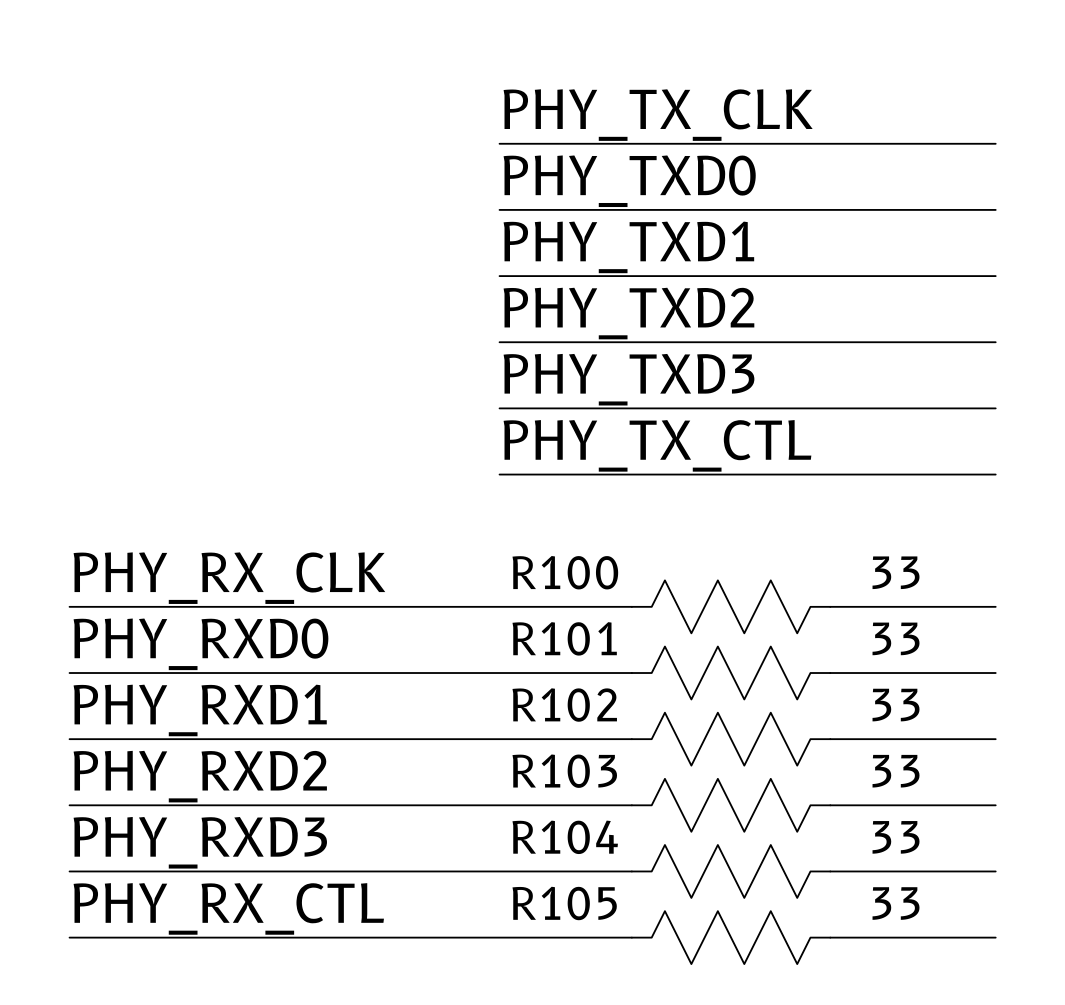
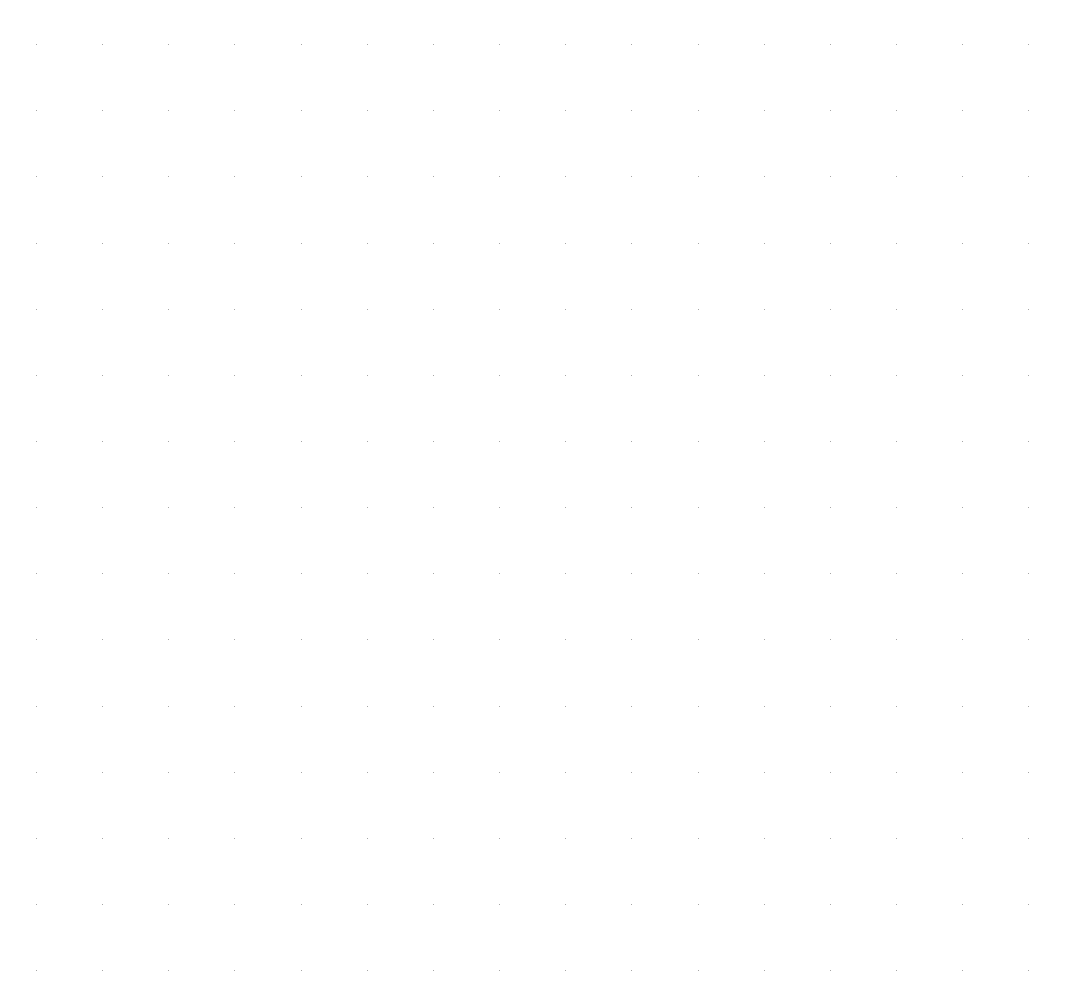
label: PHY_TX_CLK (658, 115) -> none
wire: (499, 143) (995, 143) -> none
label: PHY_TXD0 (629, 181) -> none
wire: (499, 209) (995, 209) -> none
label: PHY_TXD1 (628, 247) -> none
wire: (499, 276) (995, 276) -> none
label: PHY_TXD2 (628, 313) -> none
wire: (499, 342) (995, 342) -> none
label: PHY_TXD3 (628, 379) -> none
wire: (499, 408) (995, 408) -> none
label: PHY_TX_CTL (657, 445) -> none
wire: (499, 474) (995, 474) -> none
label: PHY_RX_CLK (229, 578) -> none
wire: (69, 606) (631, 606) -> none
R100: 33 (731, 606) -> none
wire: (830, 606) (995, 606) -> none
label: PHY_RXD0 (200, 644) -> none
wire: (69, 673) (631, 673) -> none
R101: 33 (731, 673) -> none
wire: (830, 673) (995, 673) -> none
label: PHY_RXD1 (200, 710) -> none
wire: (69, 739) (631, 739) -> none
R102: 33 (731, 739) -> none
wire: (830, 739) (995, 739) -> none
label: PHY_RXD2 (200, 776) -> none
wire: (69, 805) (631, 805) -> none
R103: 33 (731, 805) -> none
wire: (830, 805) (995, 805) -> none
label: PHY_RXD3 (200, 842) -> none
wire: (69, 871) (631, 871) -> none
R104: 33 (731, 871) -> none
wire: (830, 871) (995, 871) -> none
label: PHY_RX_CTL (228, 908) -> none
wire: (69, 937) (631, 937) -> none
R105: 33 (731, 937) -> none
wire: (830, 937) (995, 937) -> none

